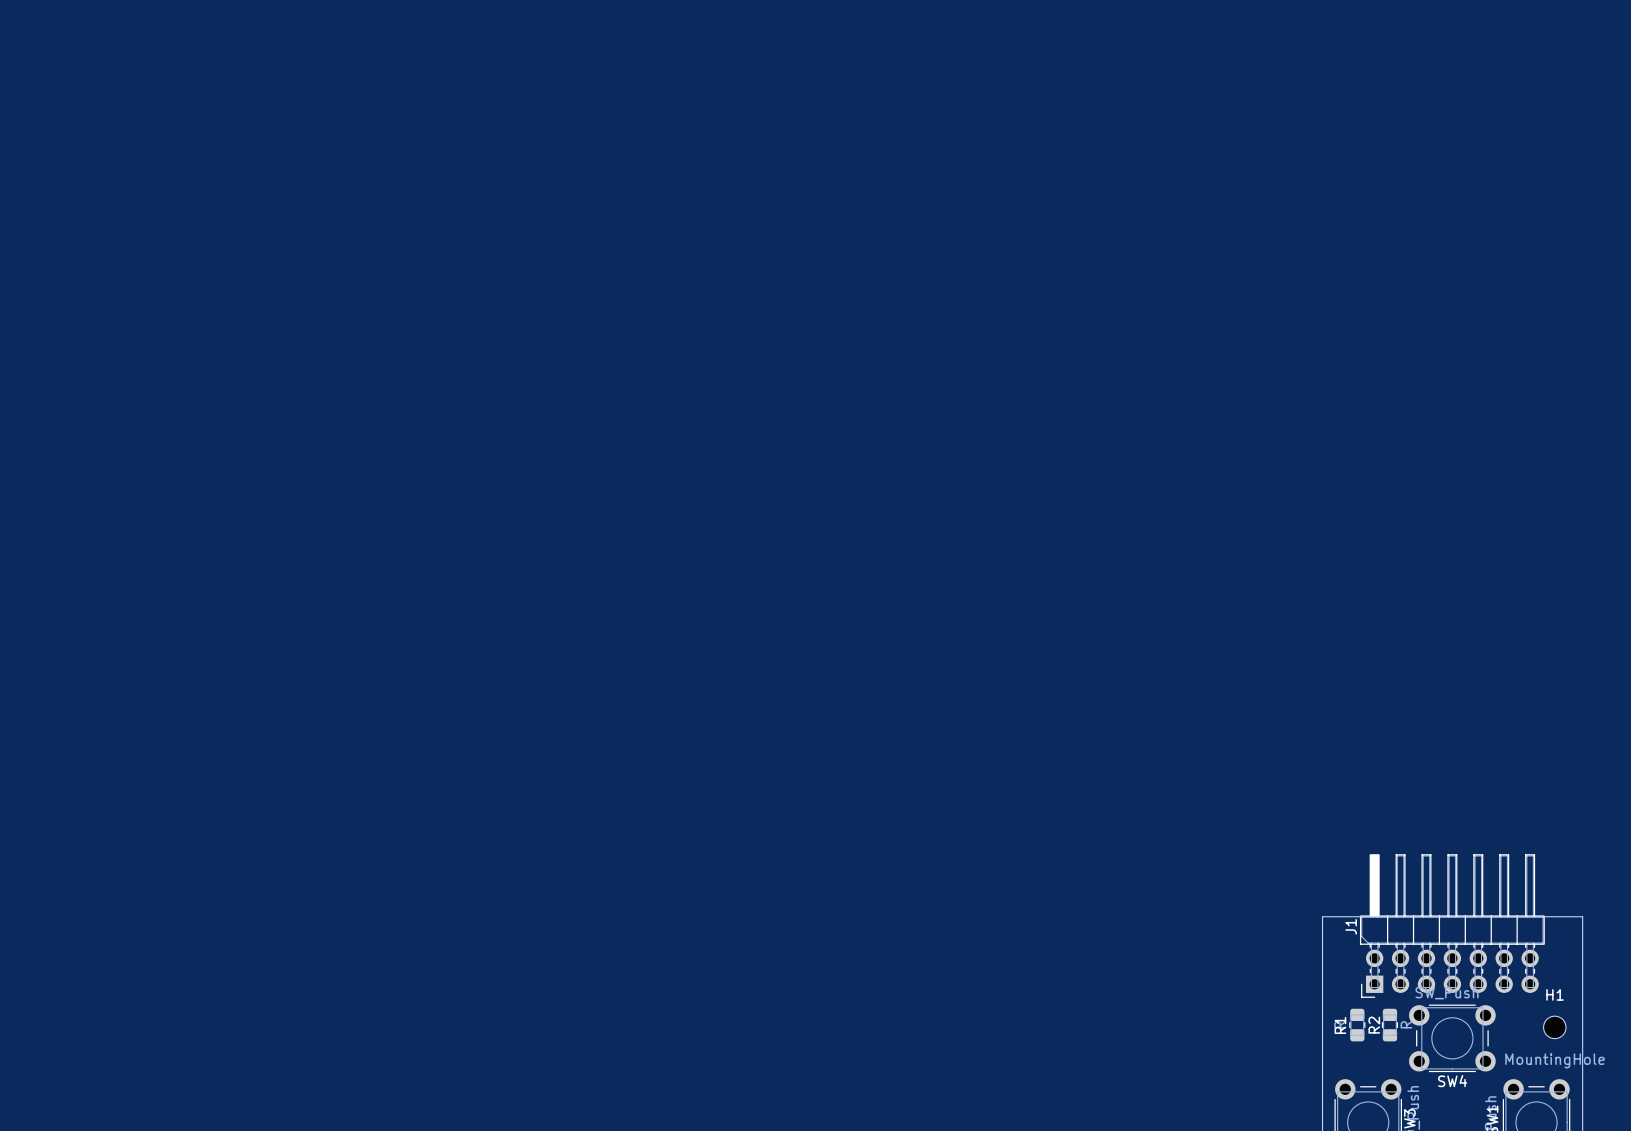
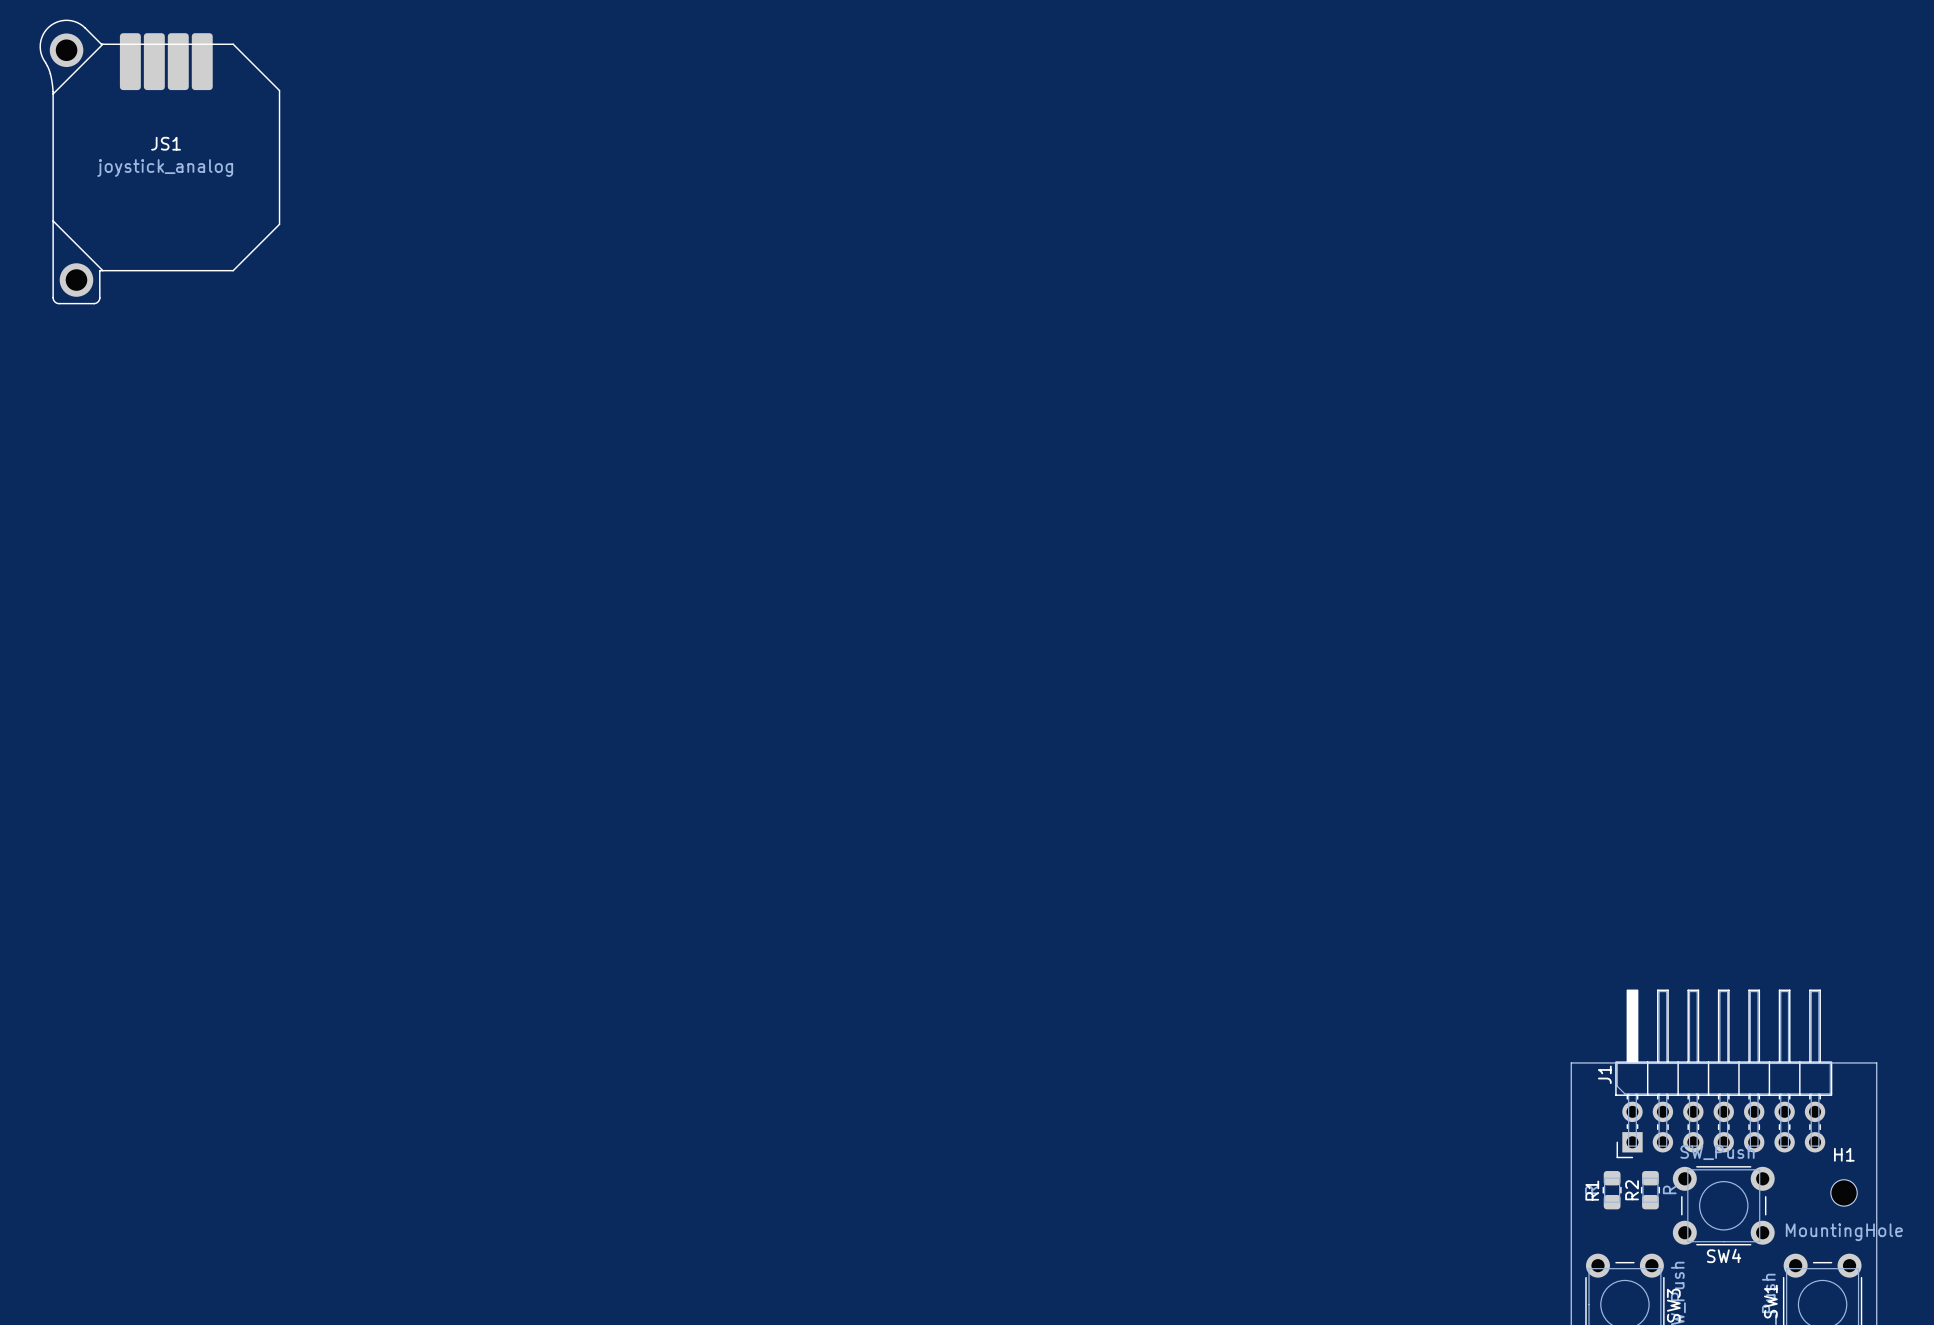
JS1: none -> joystick_analog (159, 161)

